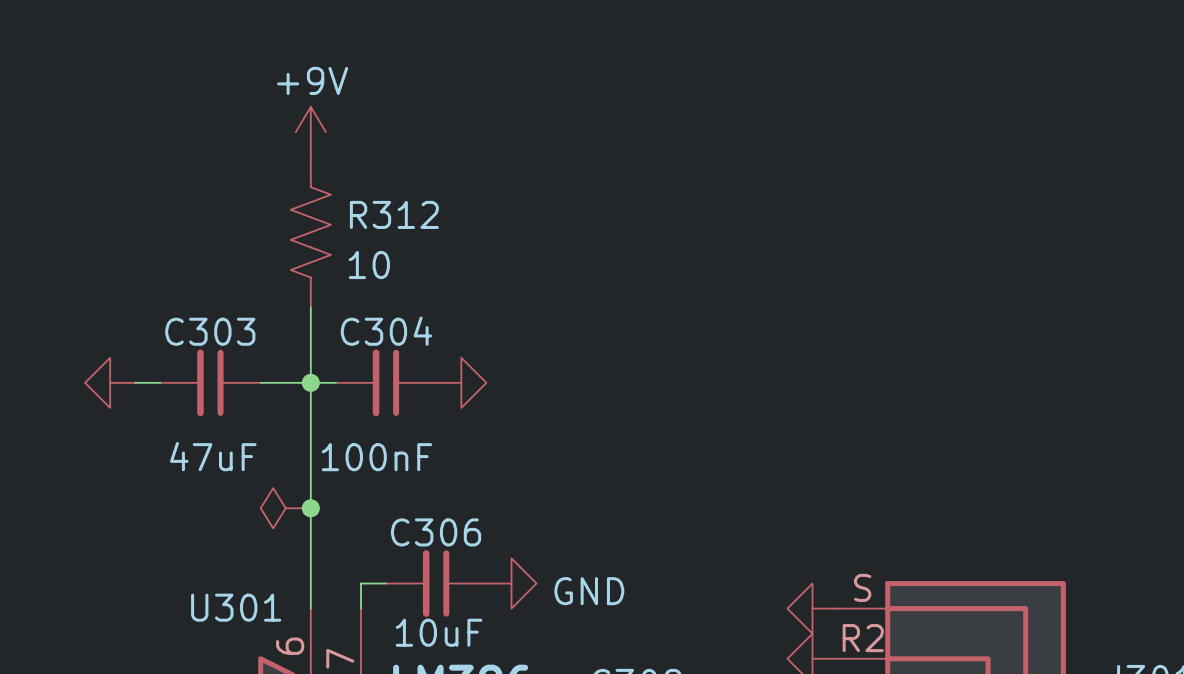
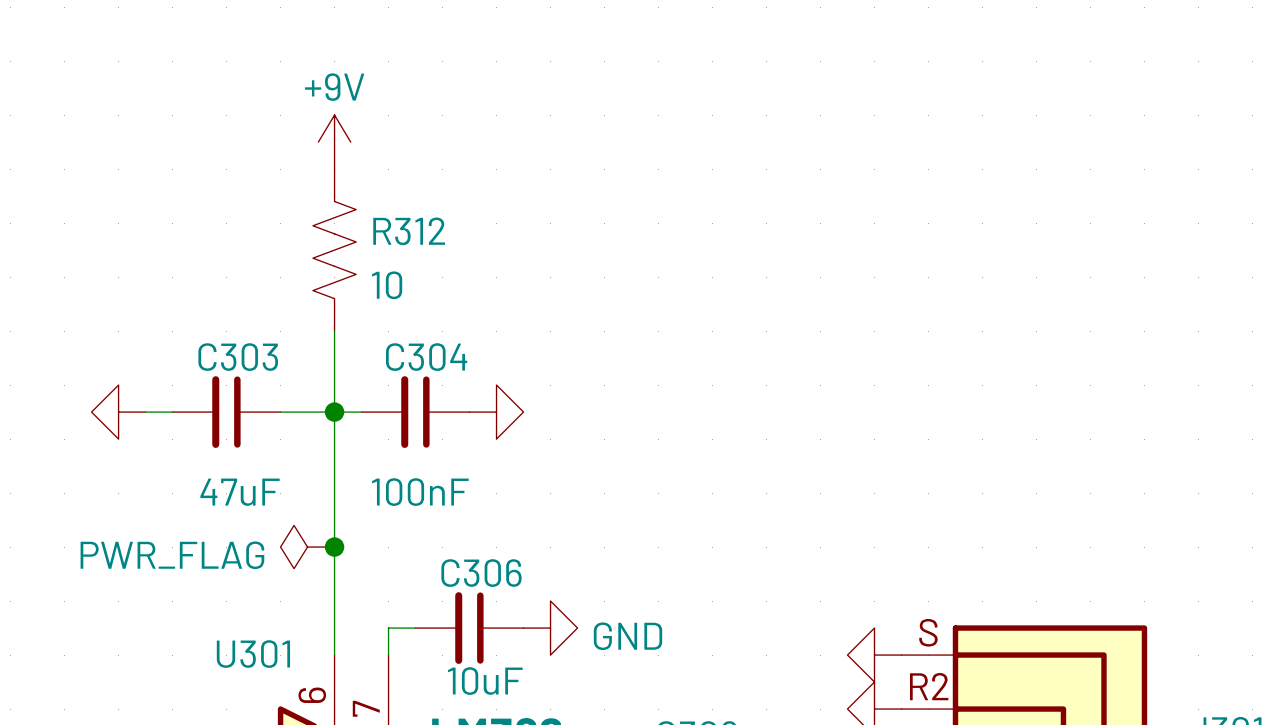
power symbol text: none -> PWR_FLAG (172, 555)

